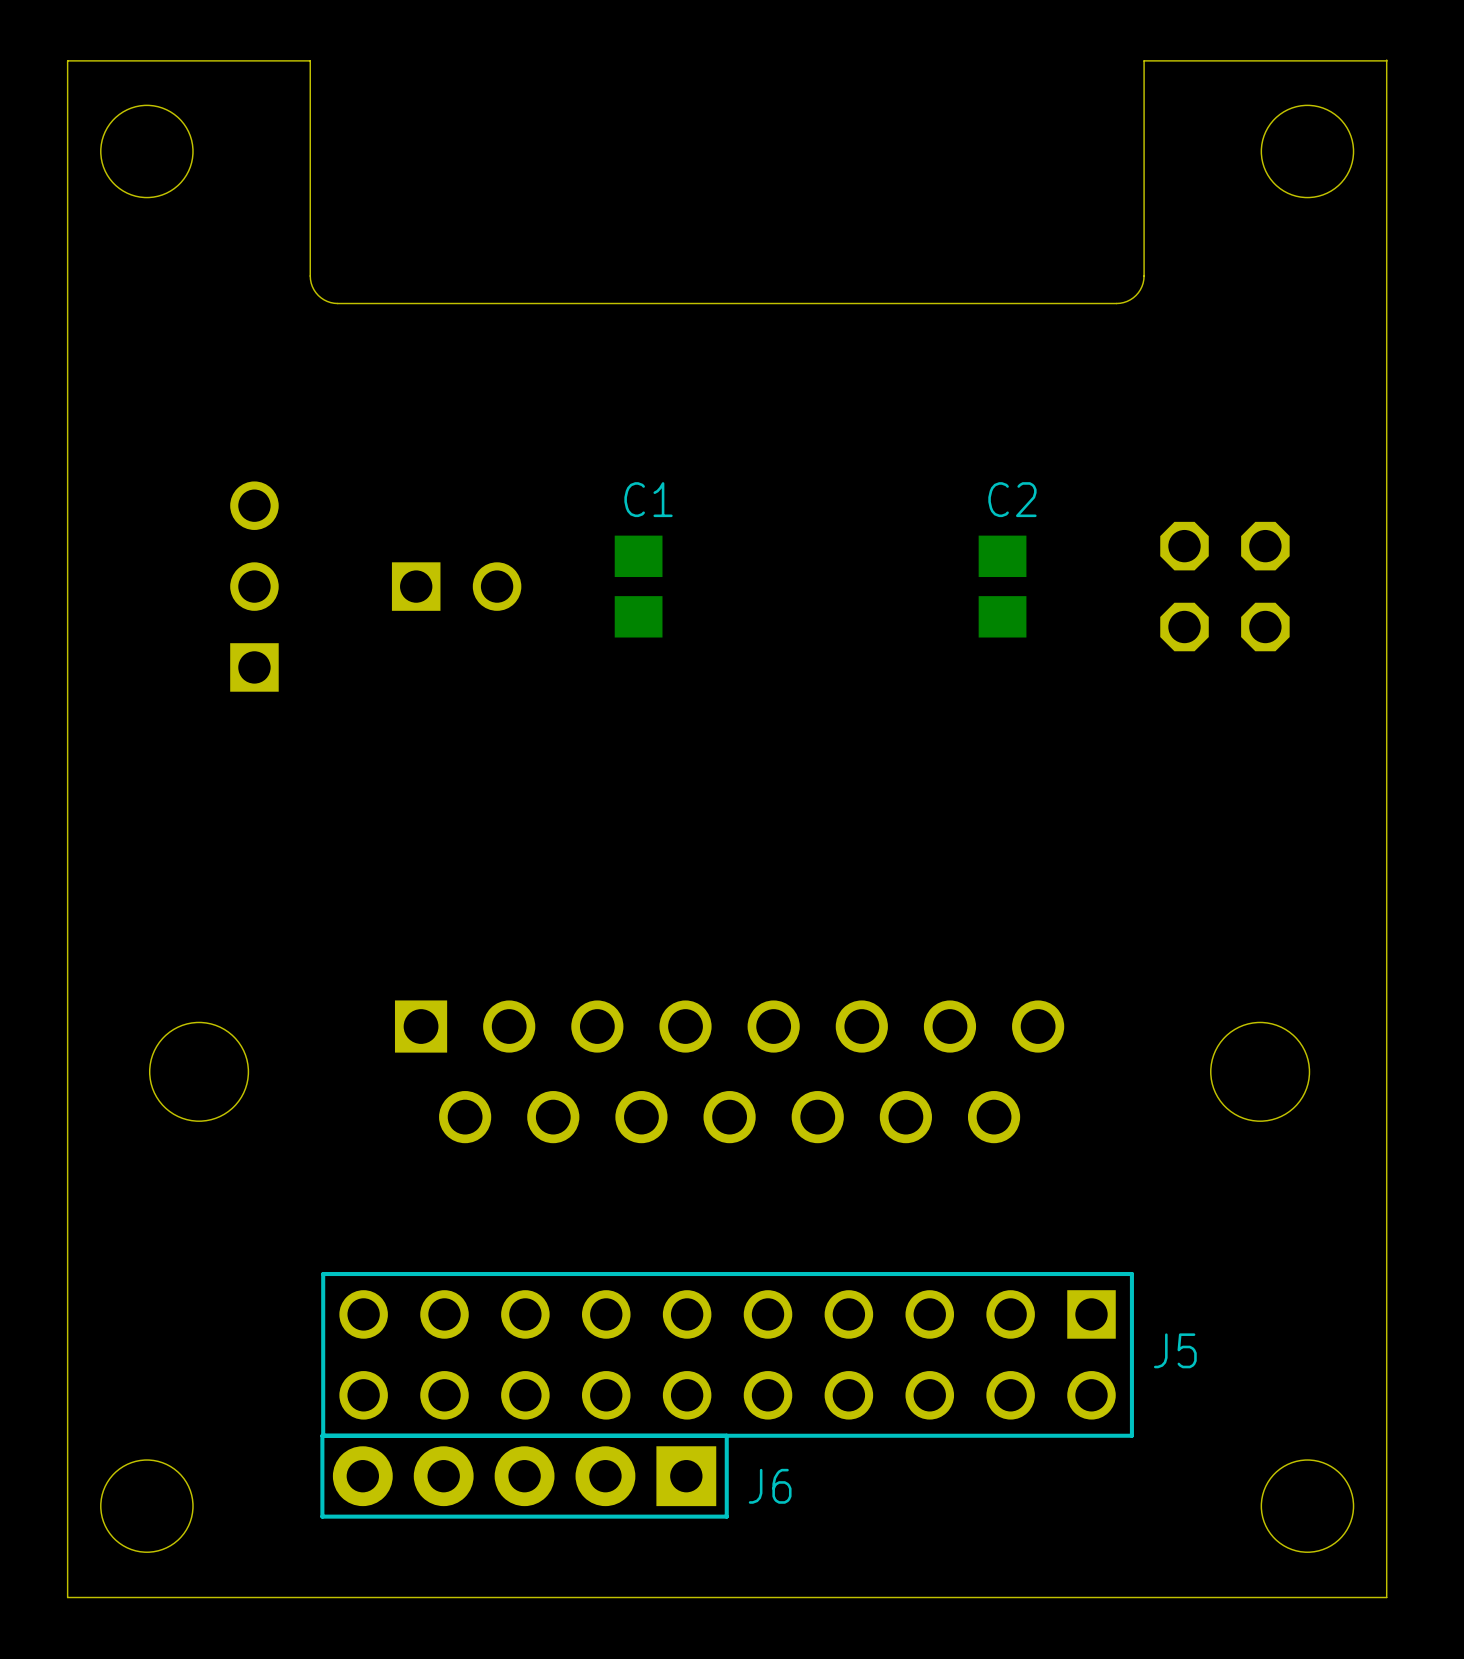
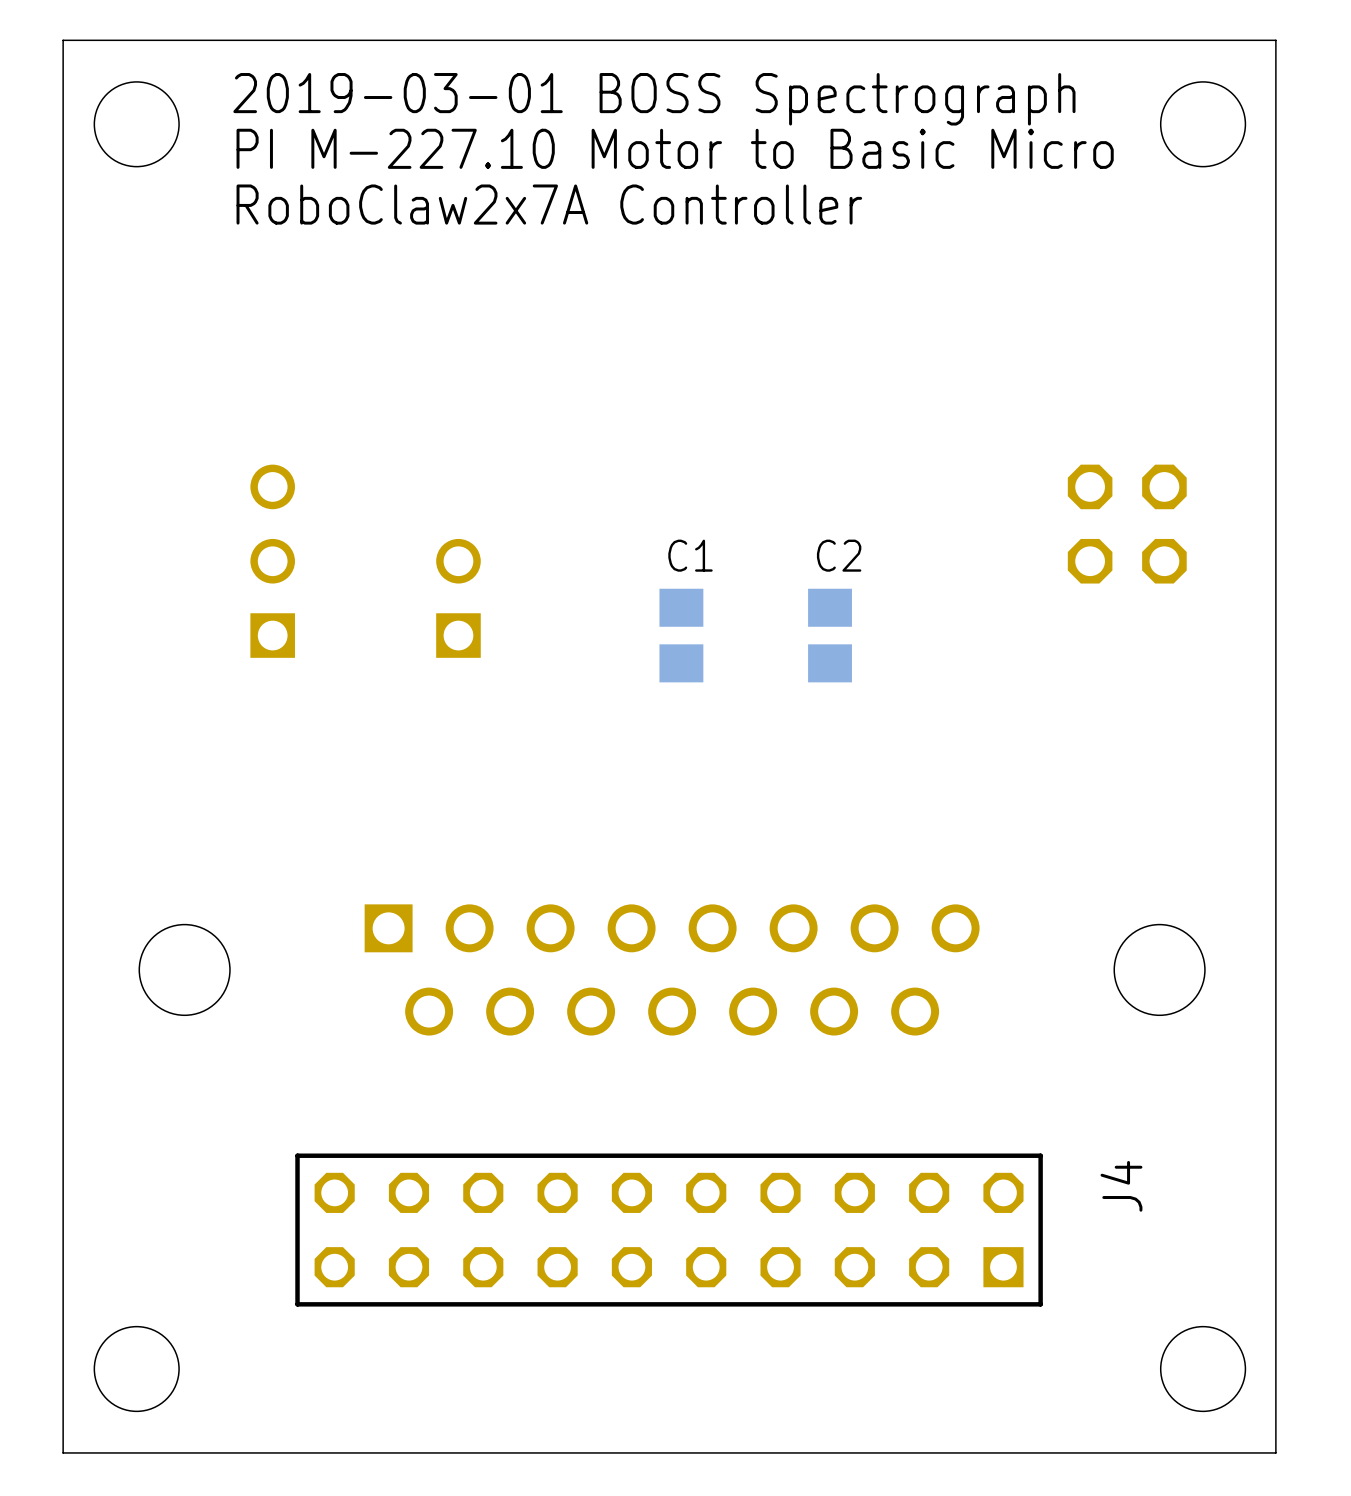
board edge: (1386, 60) (1144, 60) (1143, 279) (1136, 295) (1127, 301) (1116, 303) (330, 302) (318, 295) (310, 279) (310, 60) (67, 60) (67, 1597) -> (1275, 40) (63, 40) (63, 1452)
text: none -> 2019-03-01 BOSS Spectrograph (654, 99)
text: none -> PI M-227.10 Motor to Basic Micro (675, 148)
text: none -> RoboClaw2x7A Controller (549, 204)
part position: (254, 586) -> (272, 561)
part rotation: 0° (456, 586) -> 90° counterclockwise (458, 598)
part position: (456, 586) -> (458, 598)
C1 position: (638, 586) -> (681, 635)
C2 position: (1002, 586) -> (830, 635)
J4: none -> (669, 1230)
J5: (727, 1354) -> none
J6: (524, 1476) -> none

